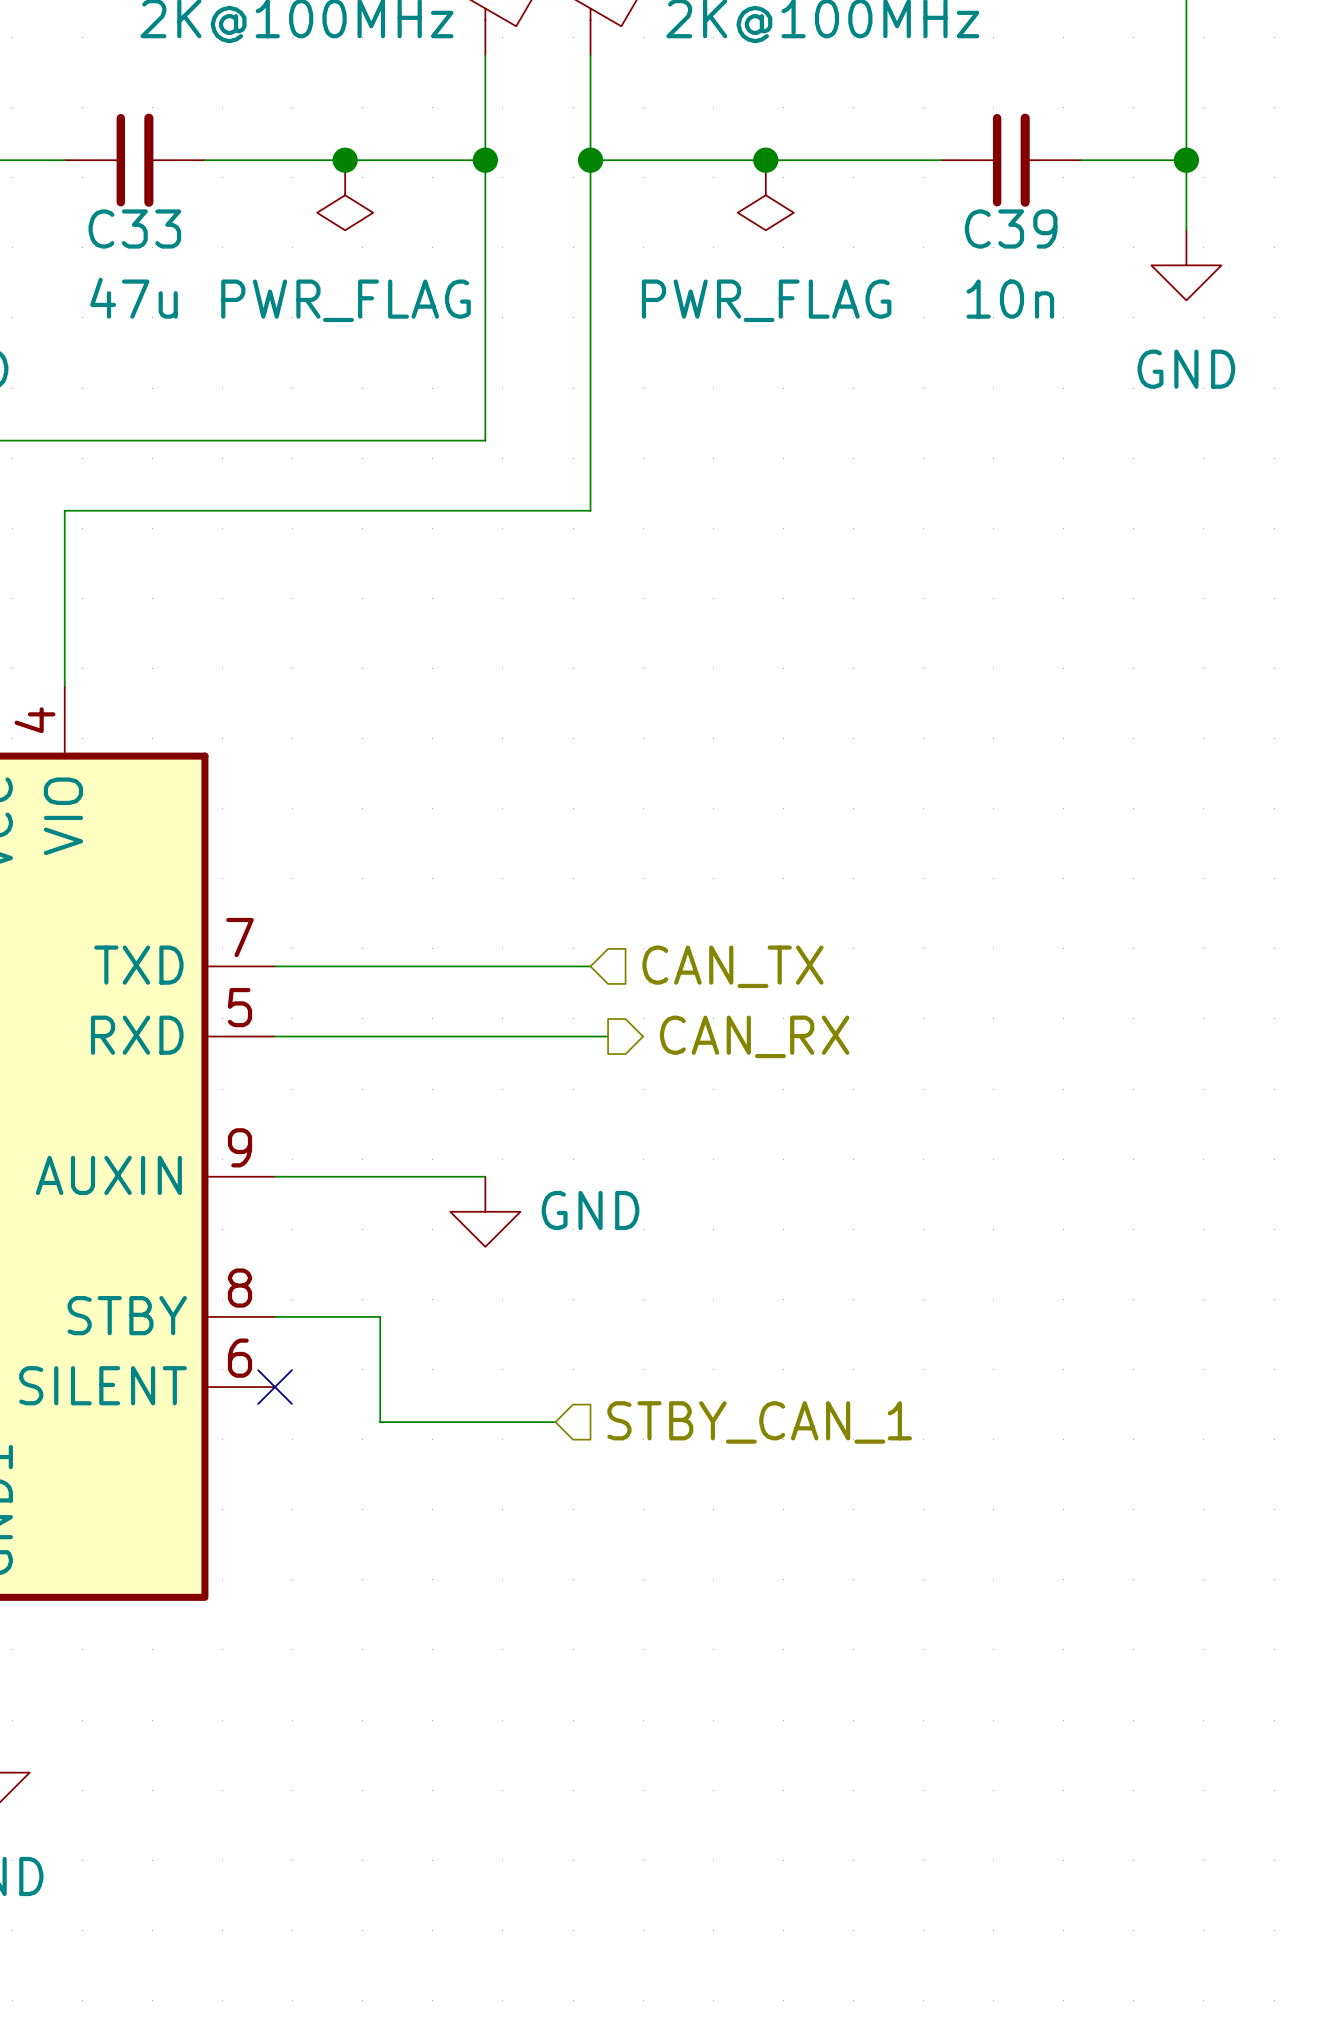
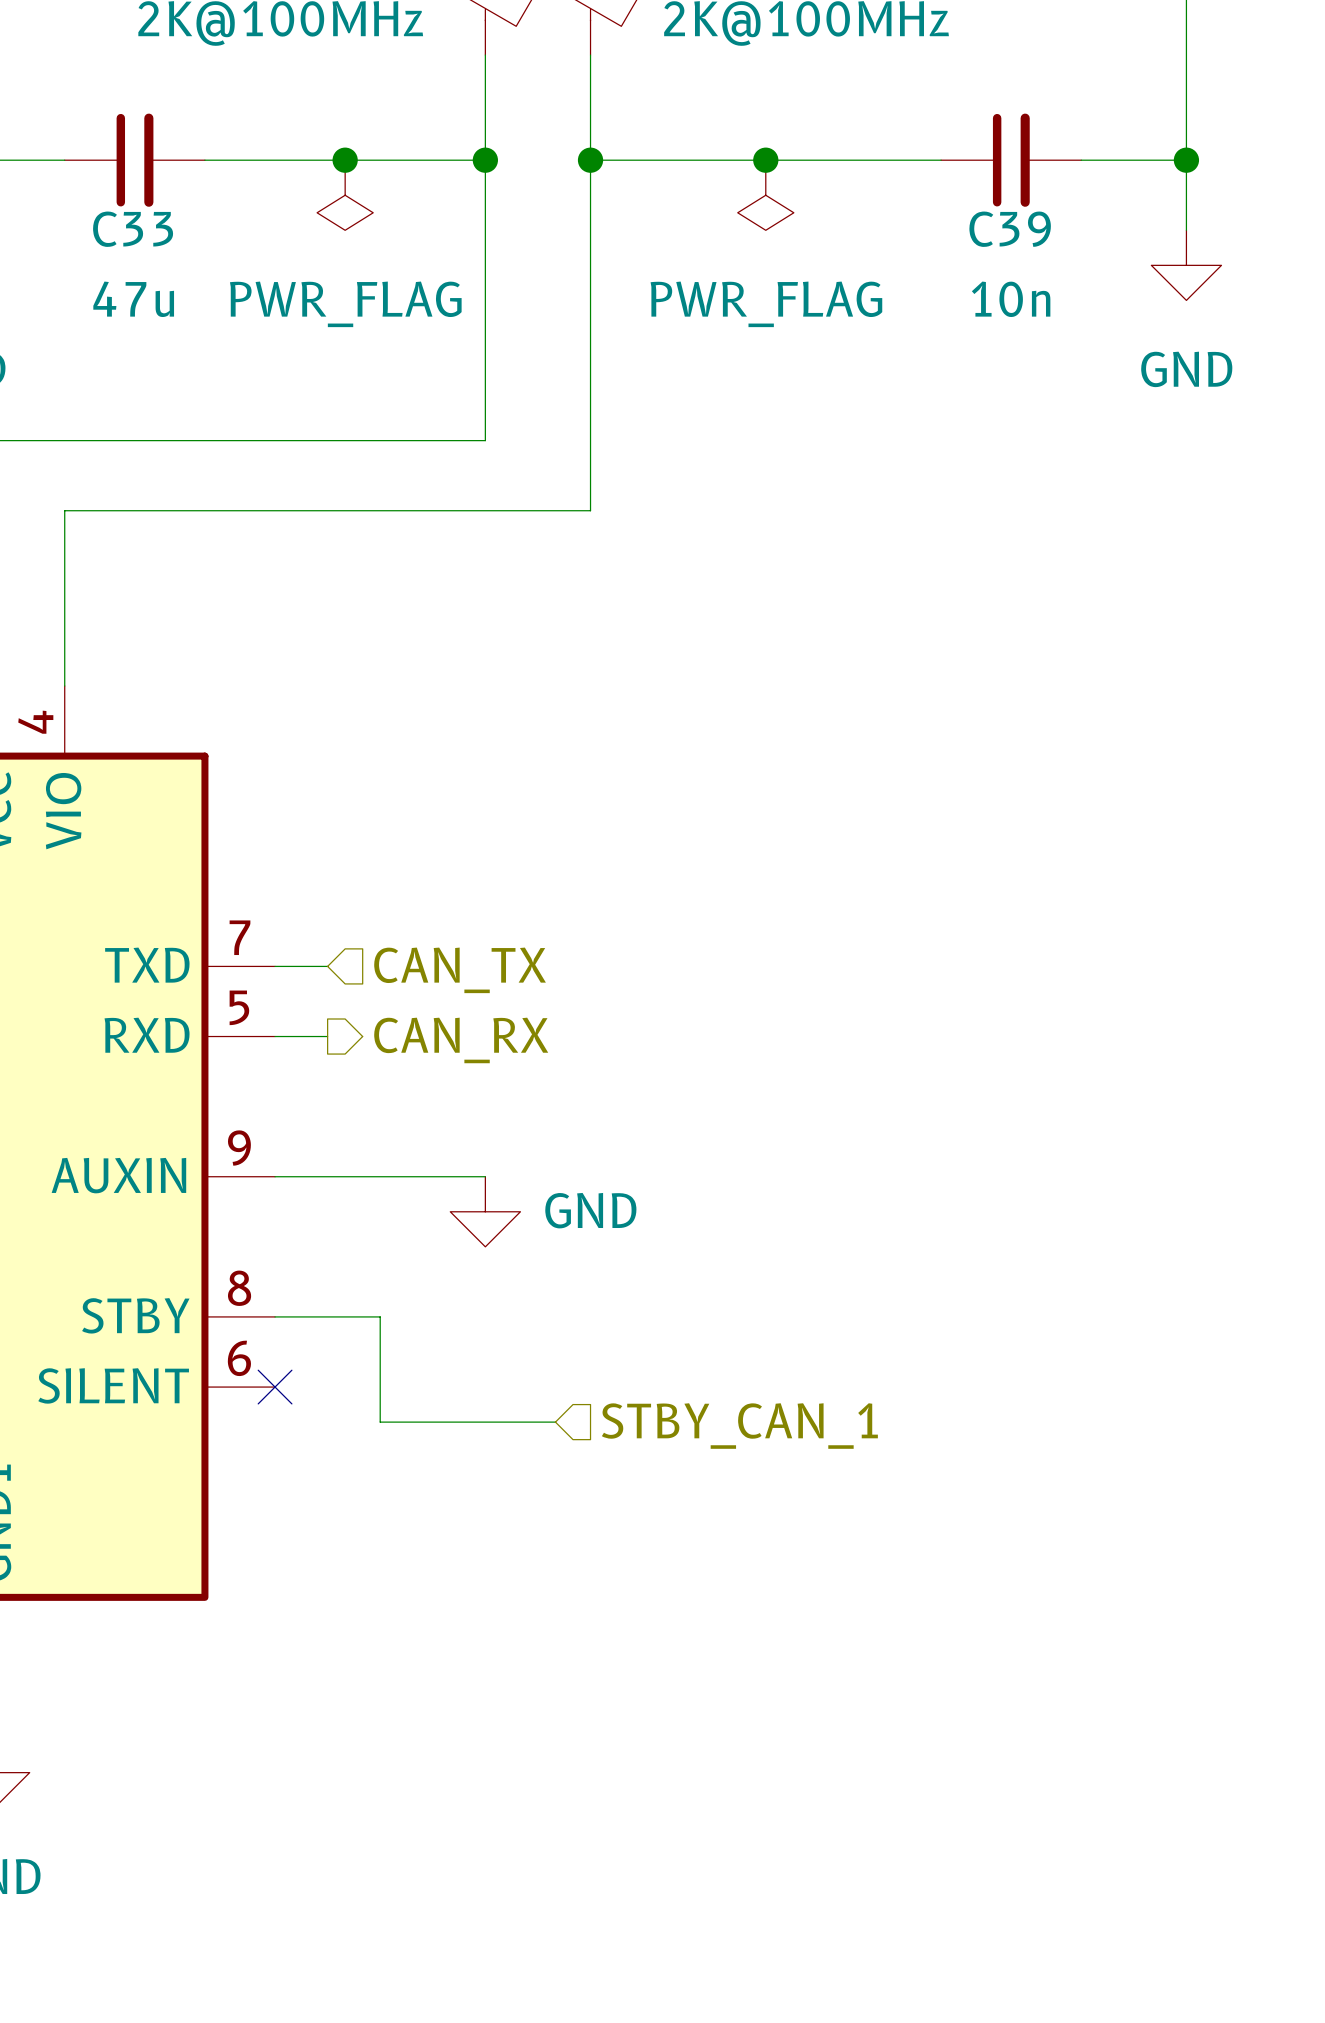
wire: (327, 966) (590, 966) -> none
hierarchical label position: CAN_TX (732, 966) -> CAN_TX (460, 970)
wire: (327, 1036) (608, 1036) -> none
hierarchical label position: CAN_RX (754, 1036) -> CAN_RX (461, 1040)

